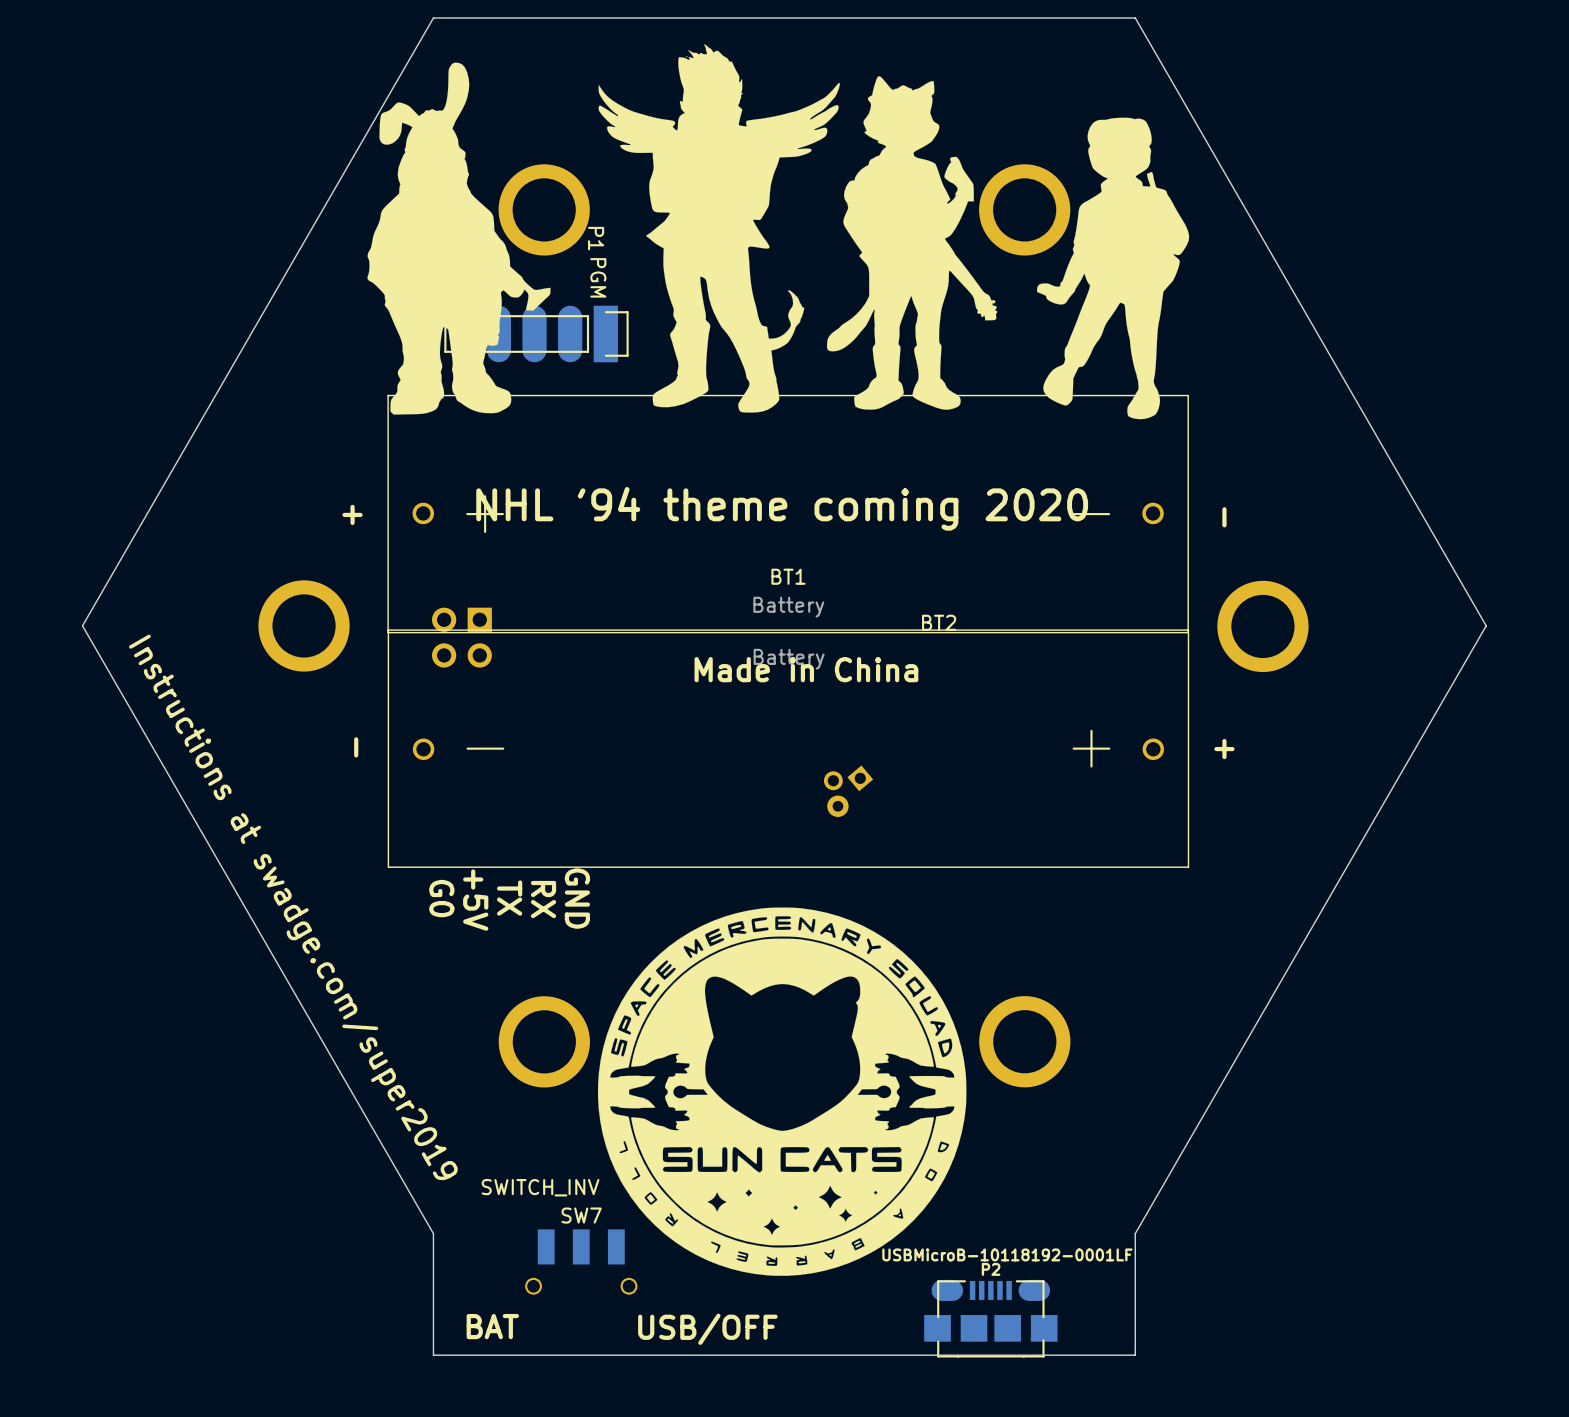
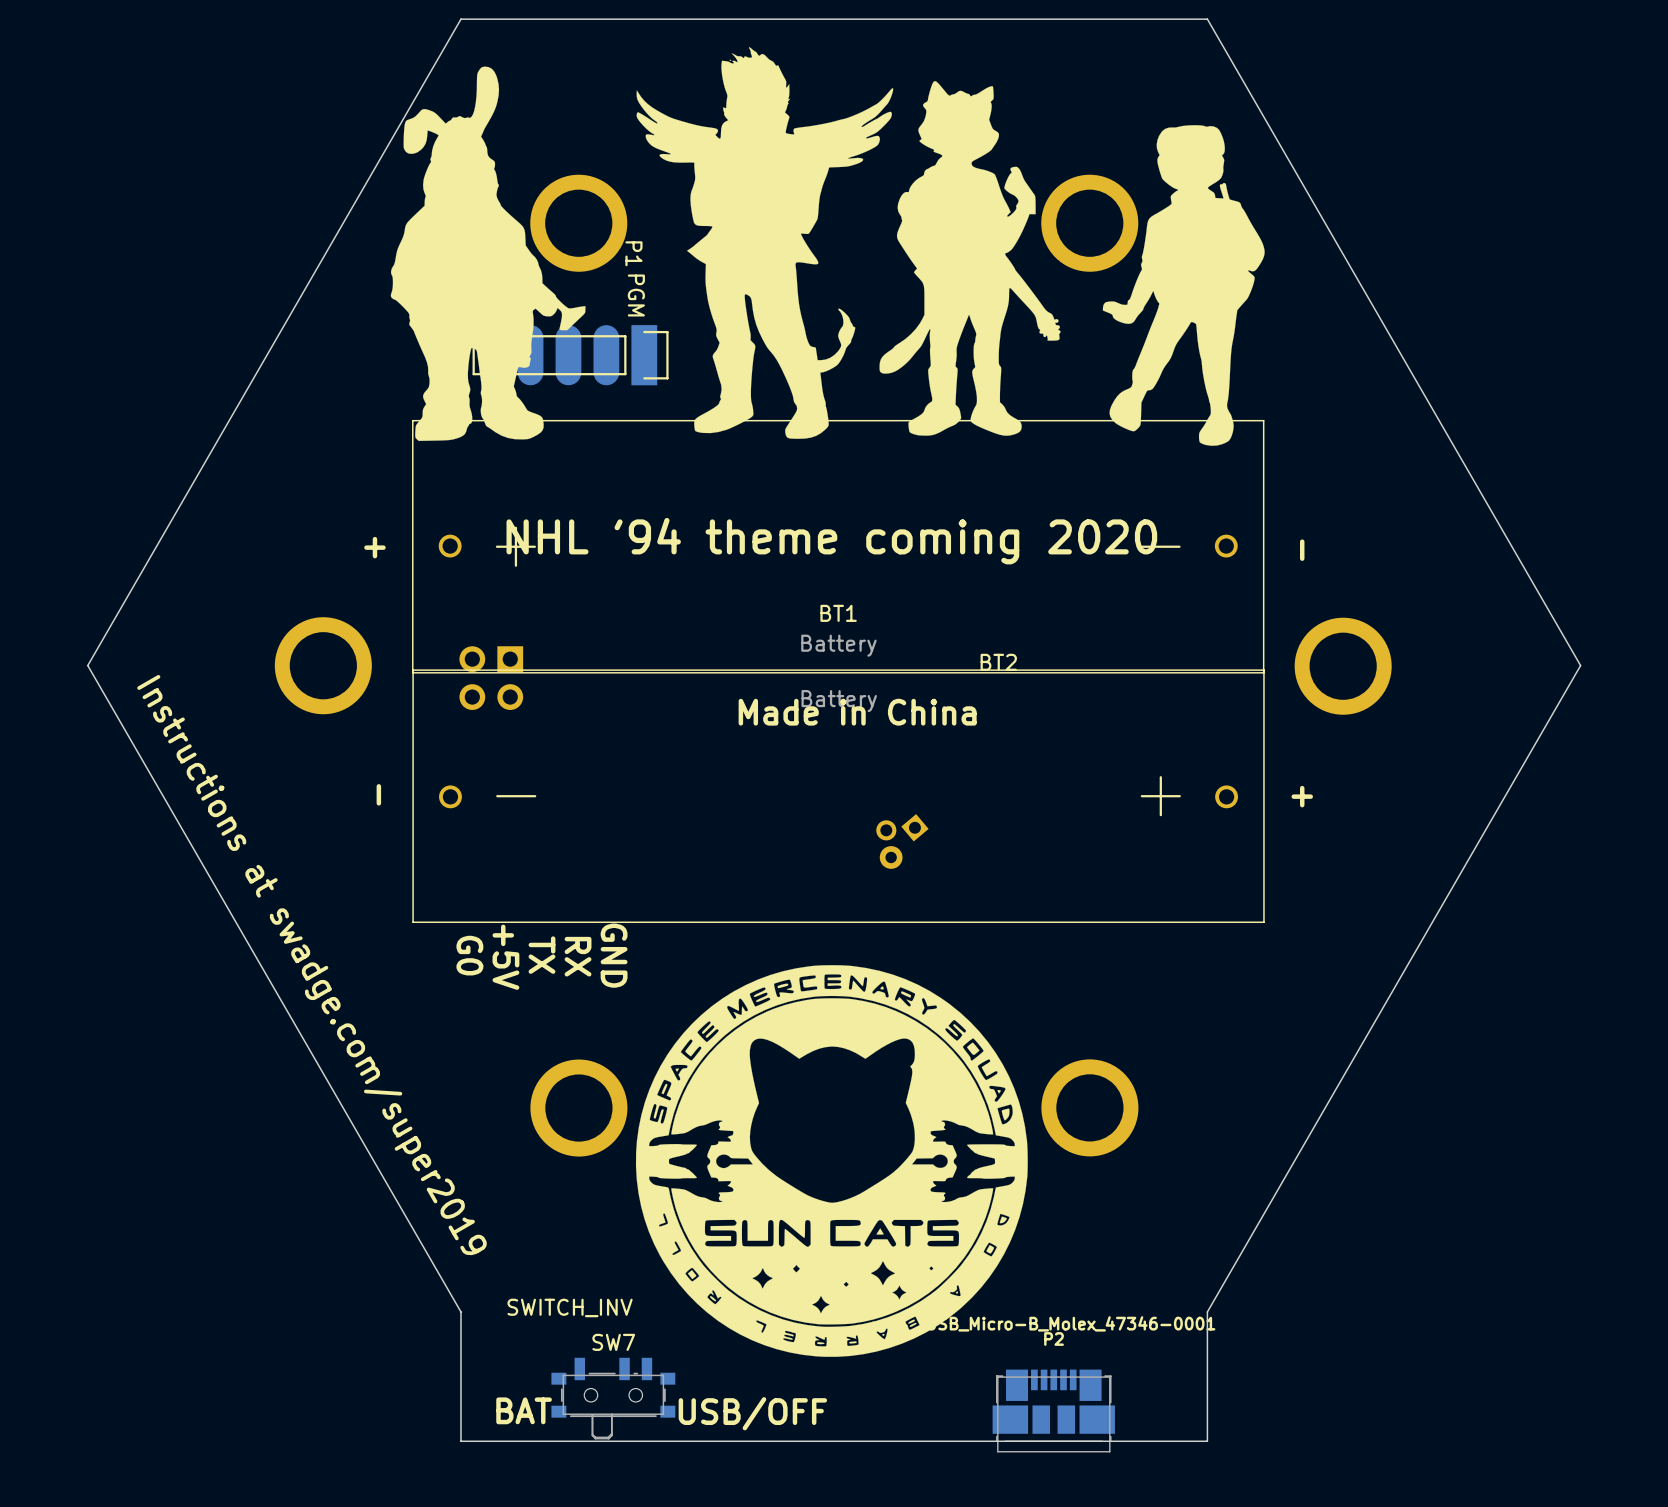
SW7 footprint: [525, 1229, 638, 1295] -> [551, 1357, 676, 1440]
P2 value: USBMicroB-10118192-0001LF (1007, 1254) -> USB_Micro-B_Molex_47346-0001 (1071, 1323)
P2 footprint: [924, 1279, 1058, 1358] -> [992, 1369, 1115, 1453]

